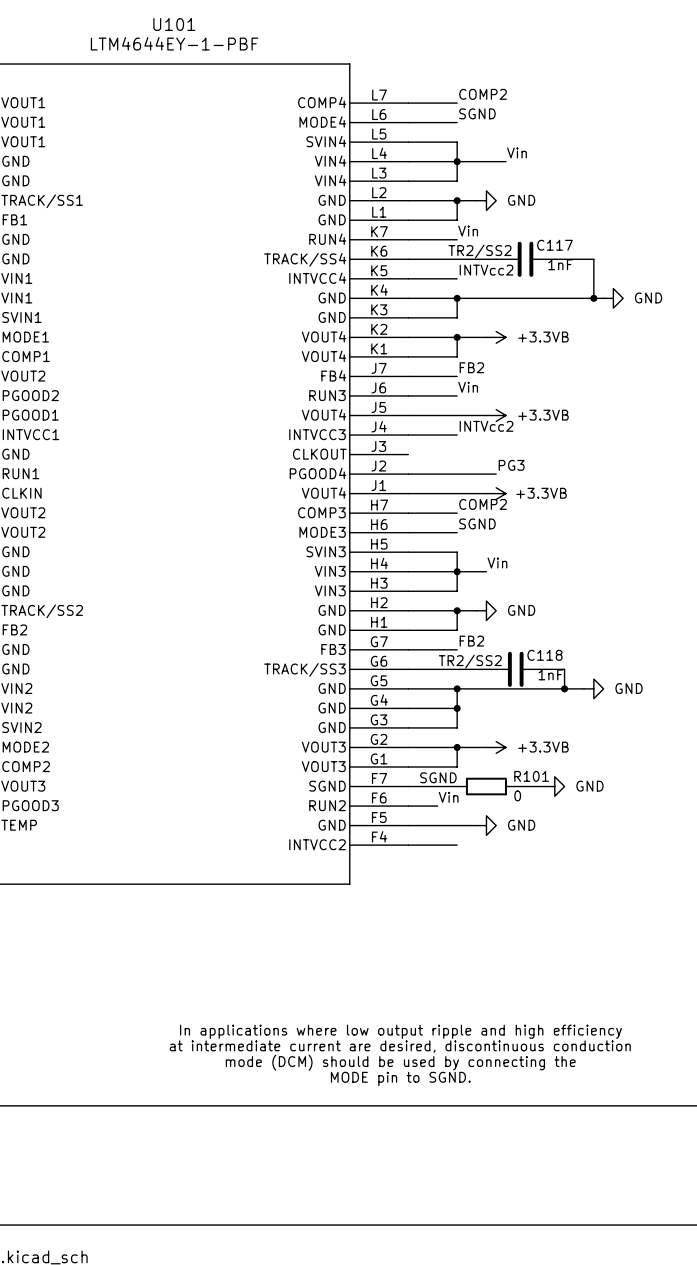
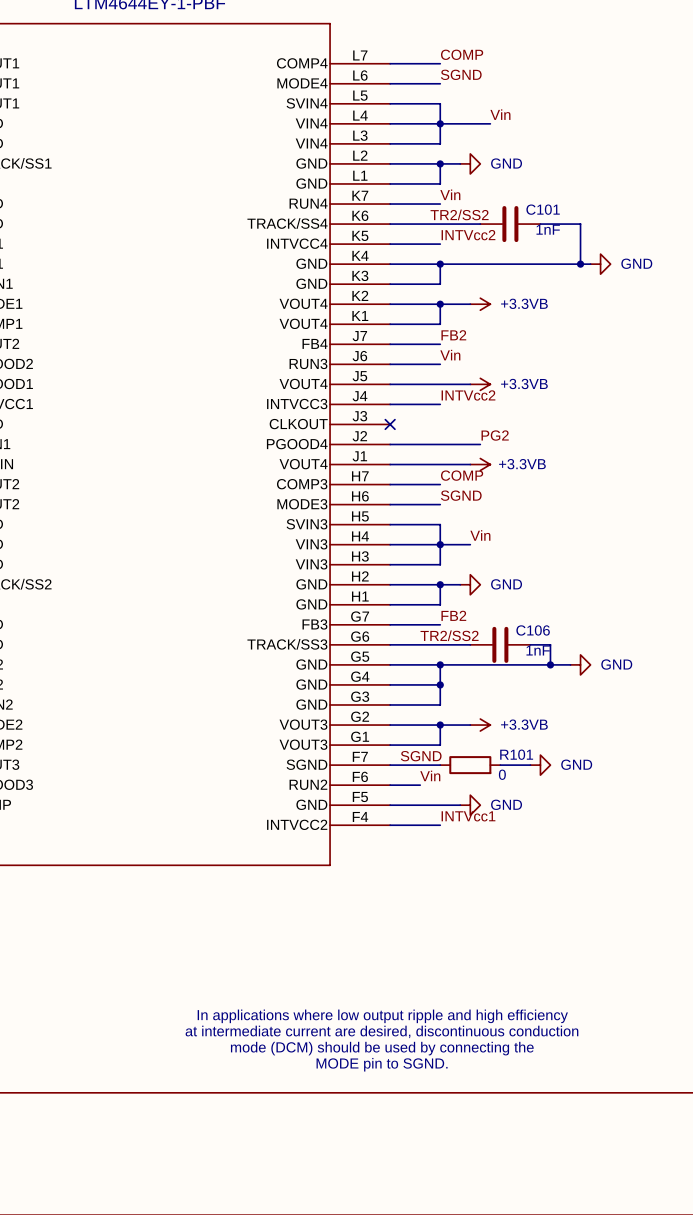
label: COMP2 (483, 94) -> COMP (462, 54)
C117 name: C117 (554, 245) -> C101 (543, 209)
no-connect mark: none -> (390, 424)
label: PG3 (511, 465) -> PG2 (495, 435)
label: COMP2 (483, 504) -> COMP (462, 475)
C118 name: C118 (544, 655) -> C106 (533, 630)
label: none -> INTVcc1 (468, 816)

